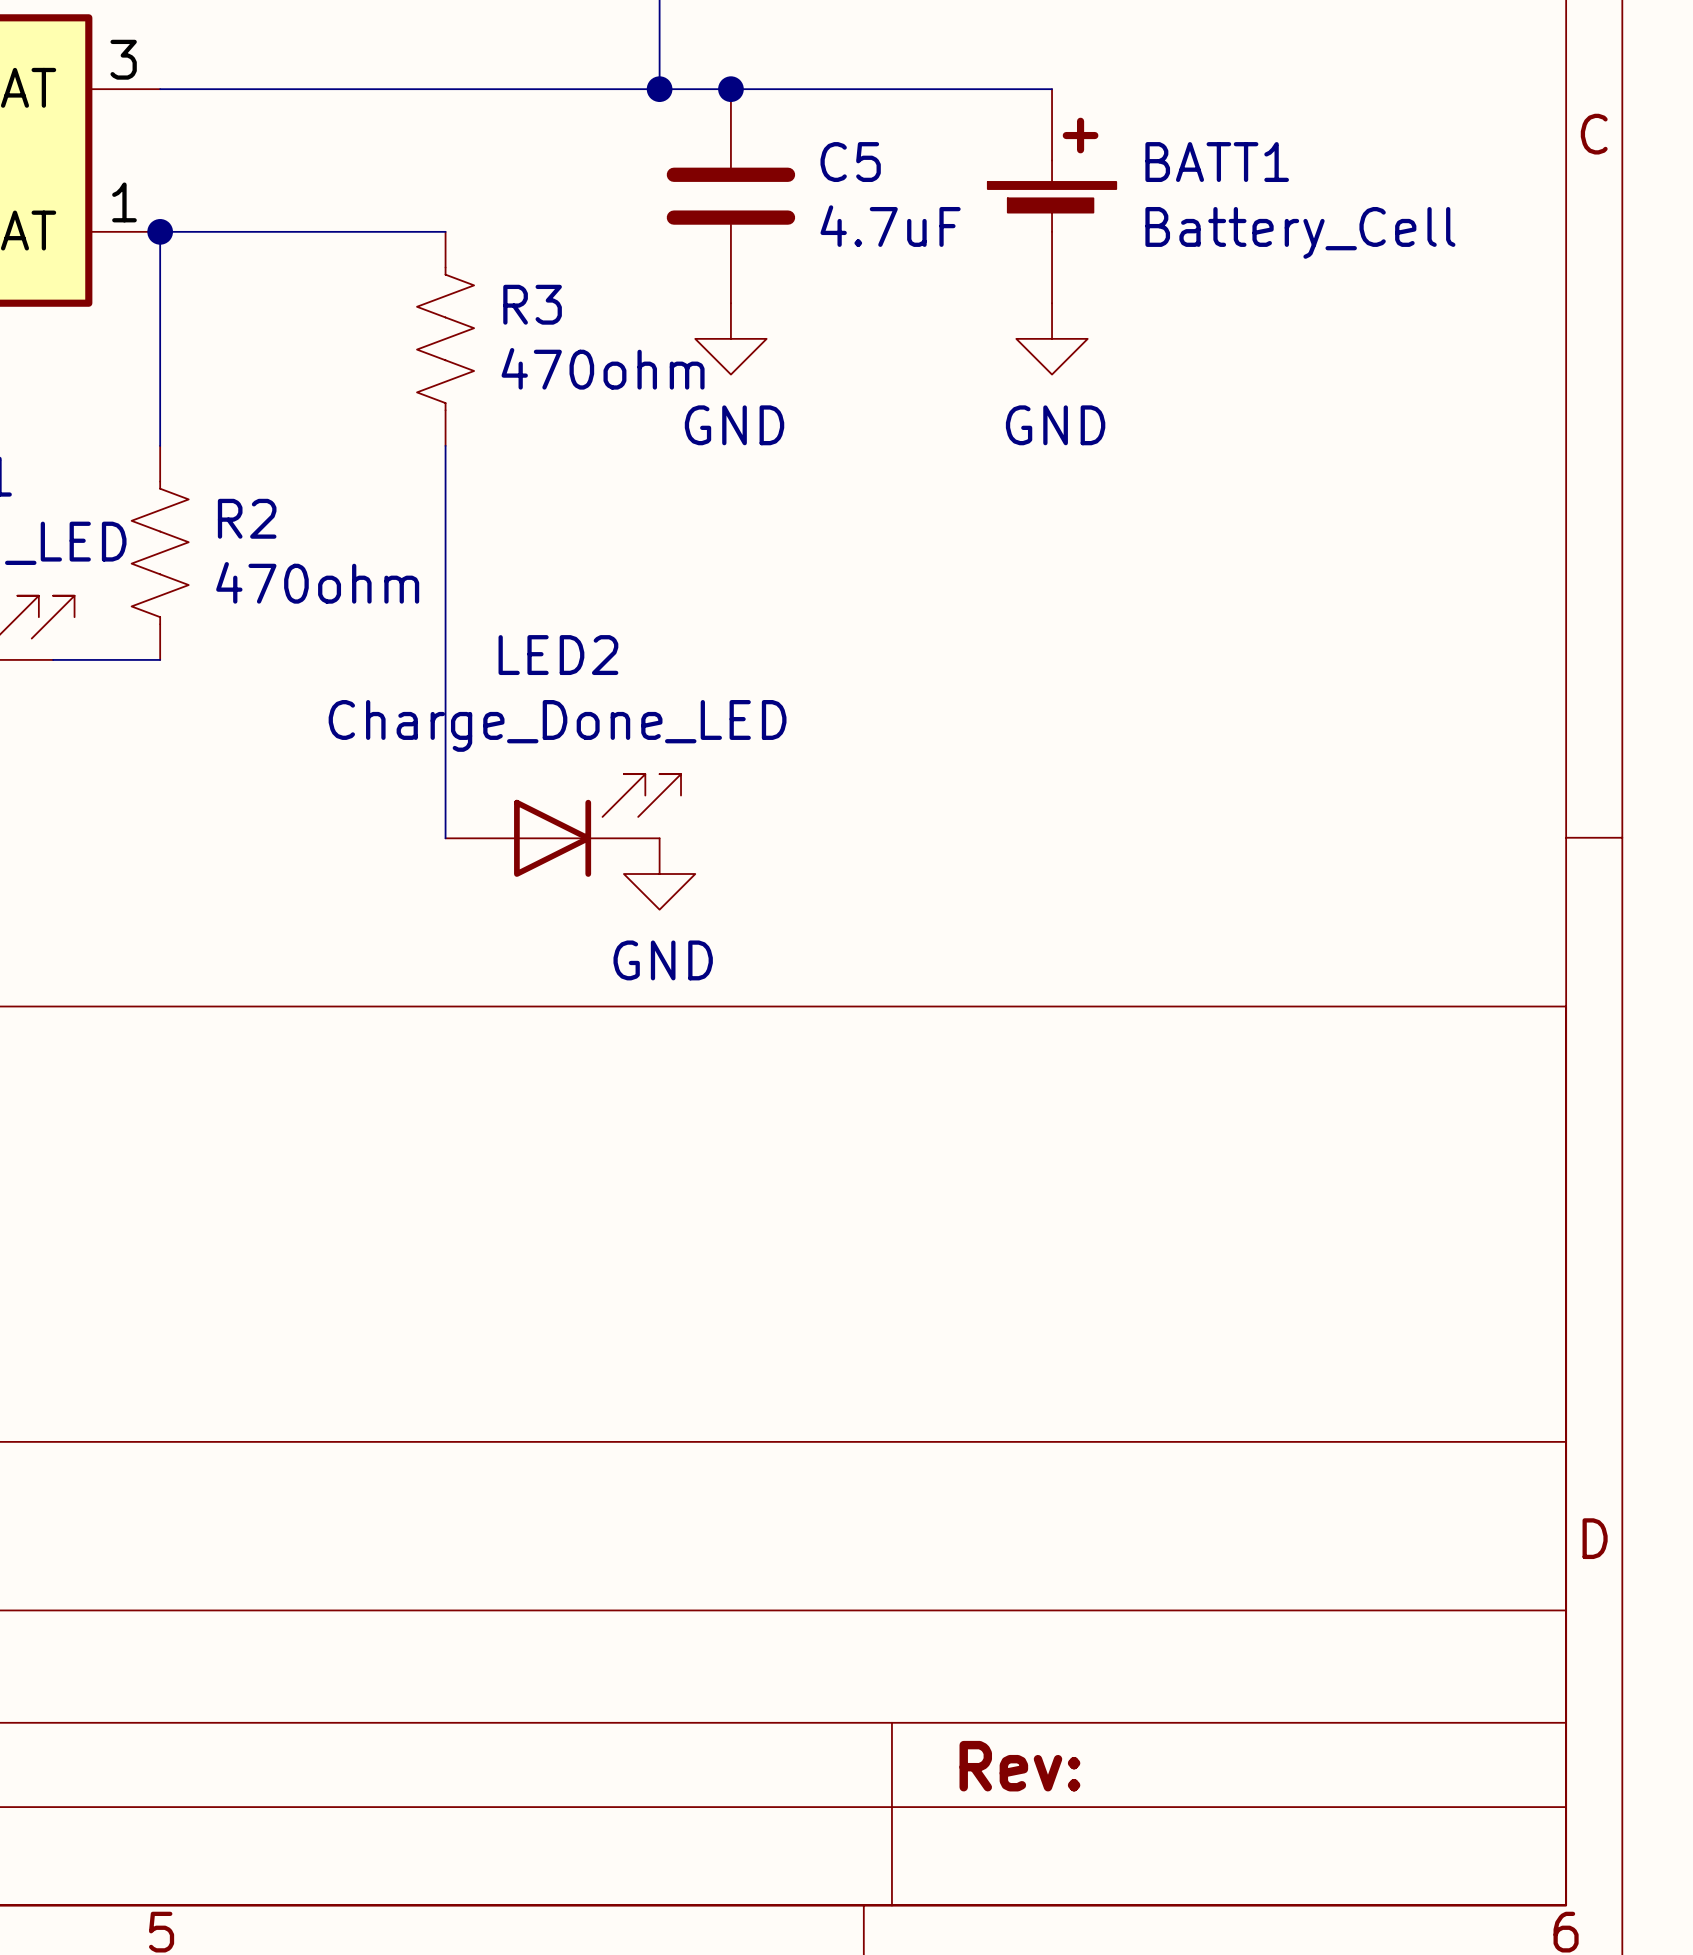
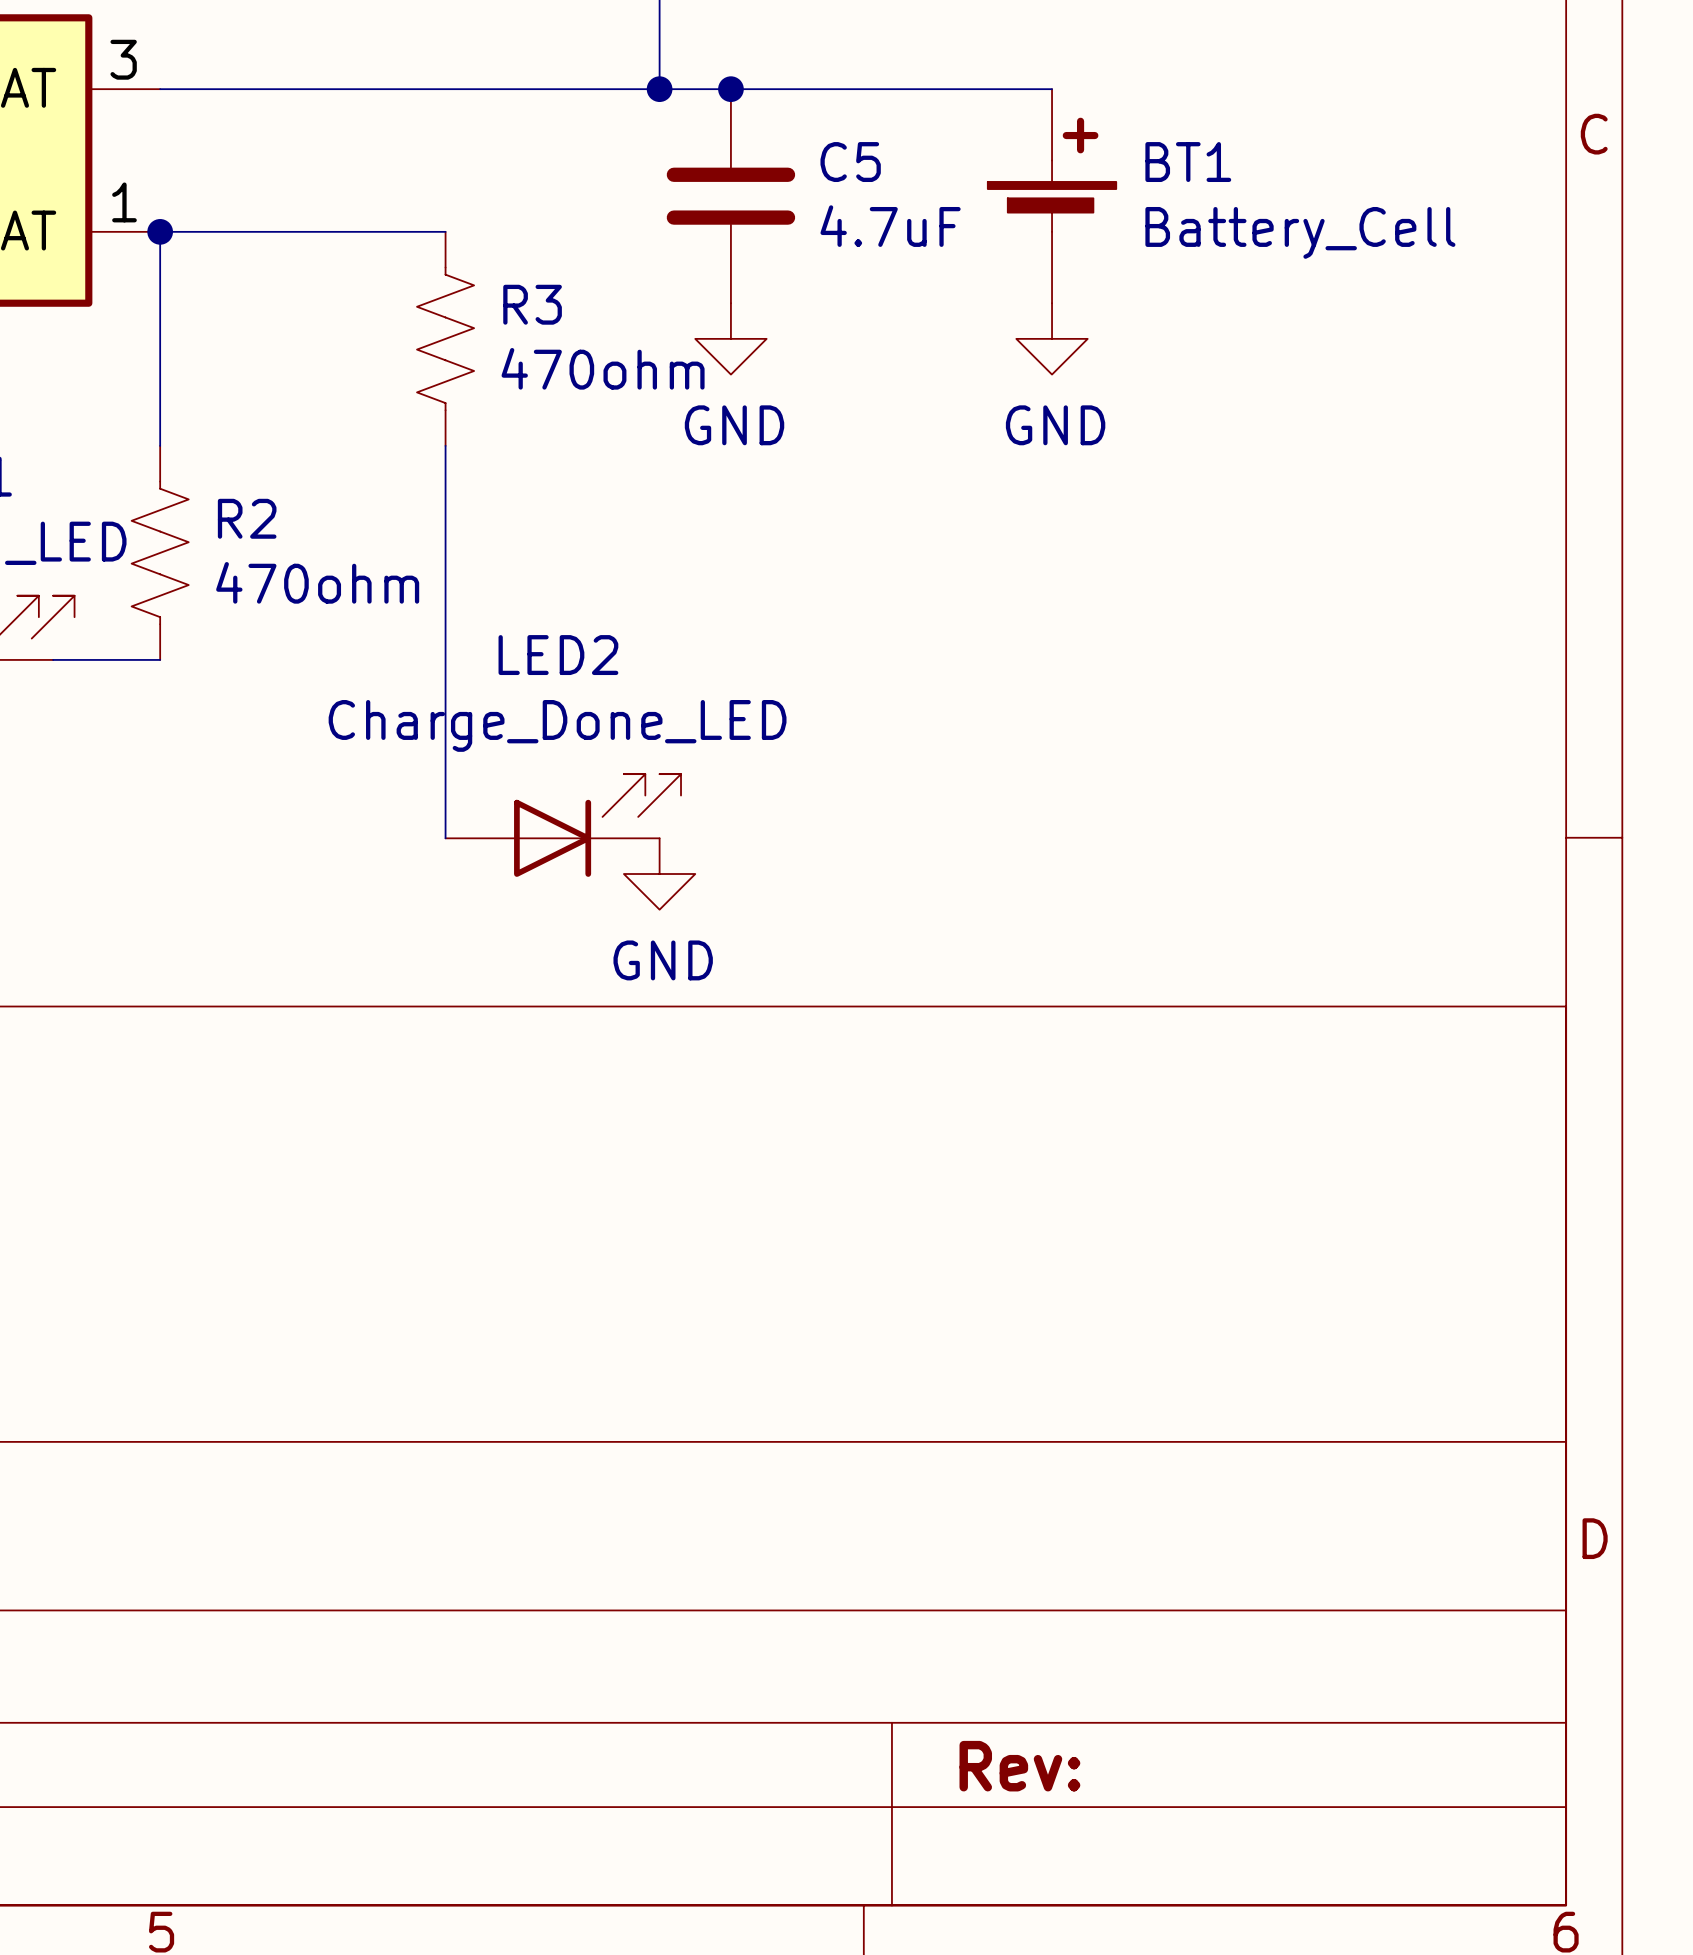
BATT1 name: BATT1 (1217, 162) -> BT1 (1188, 162)

